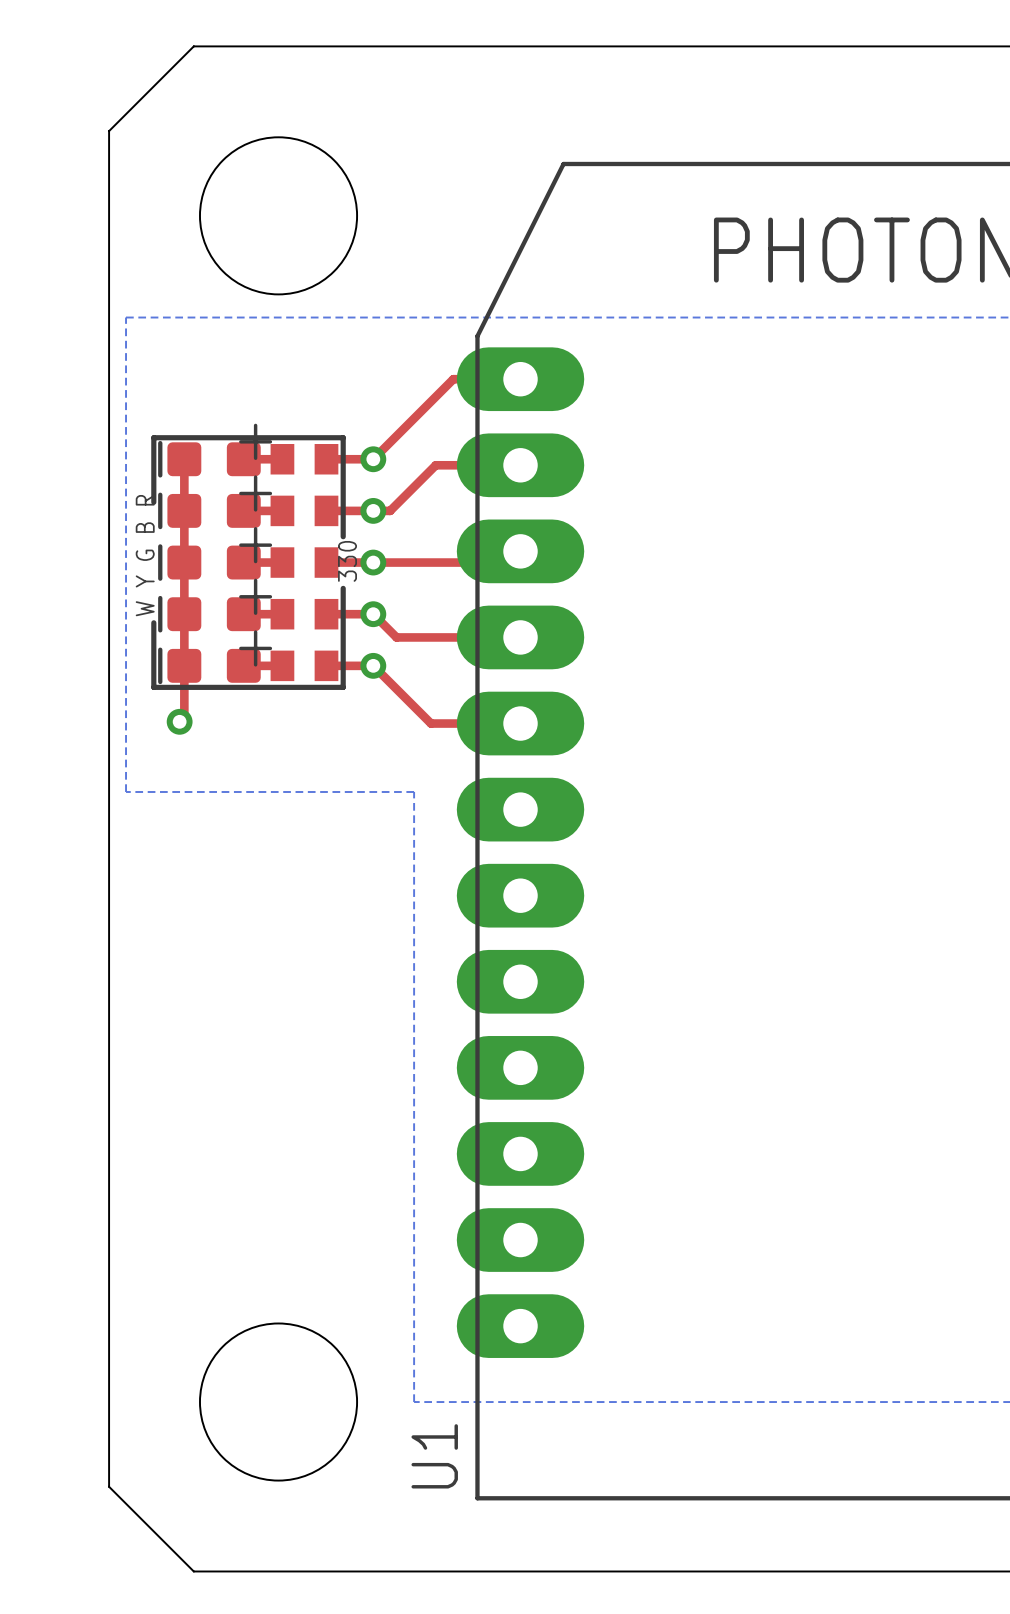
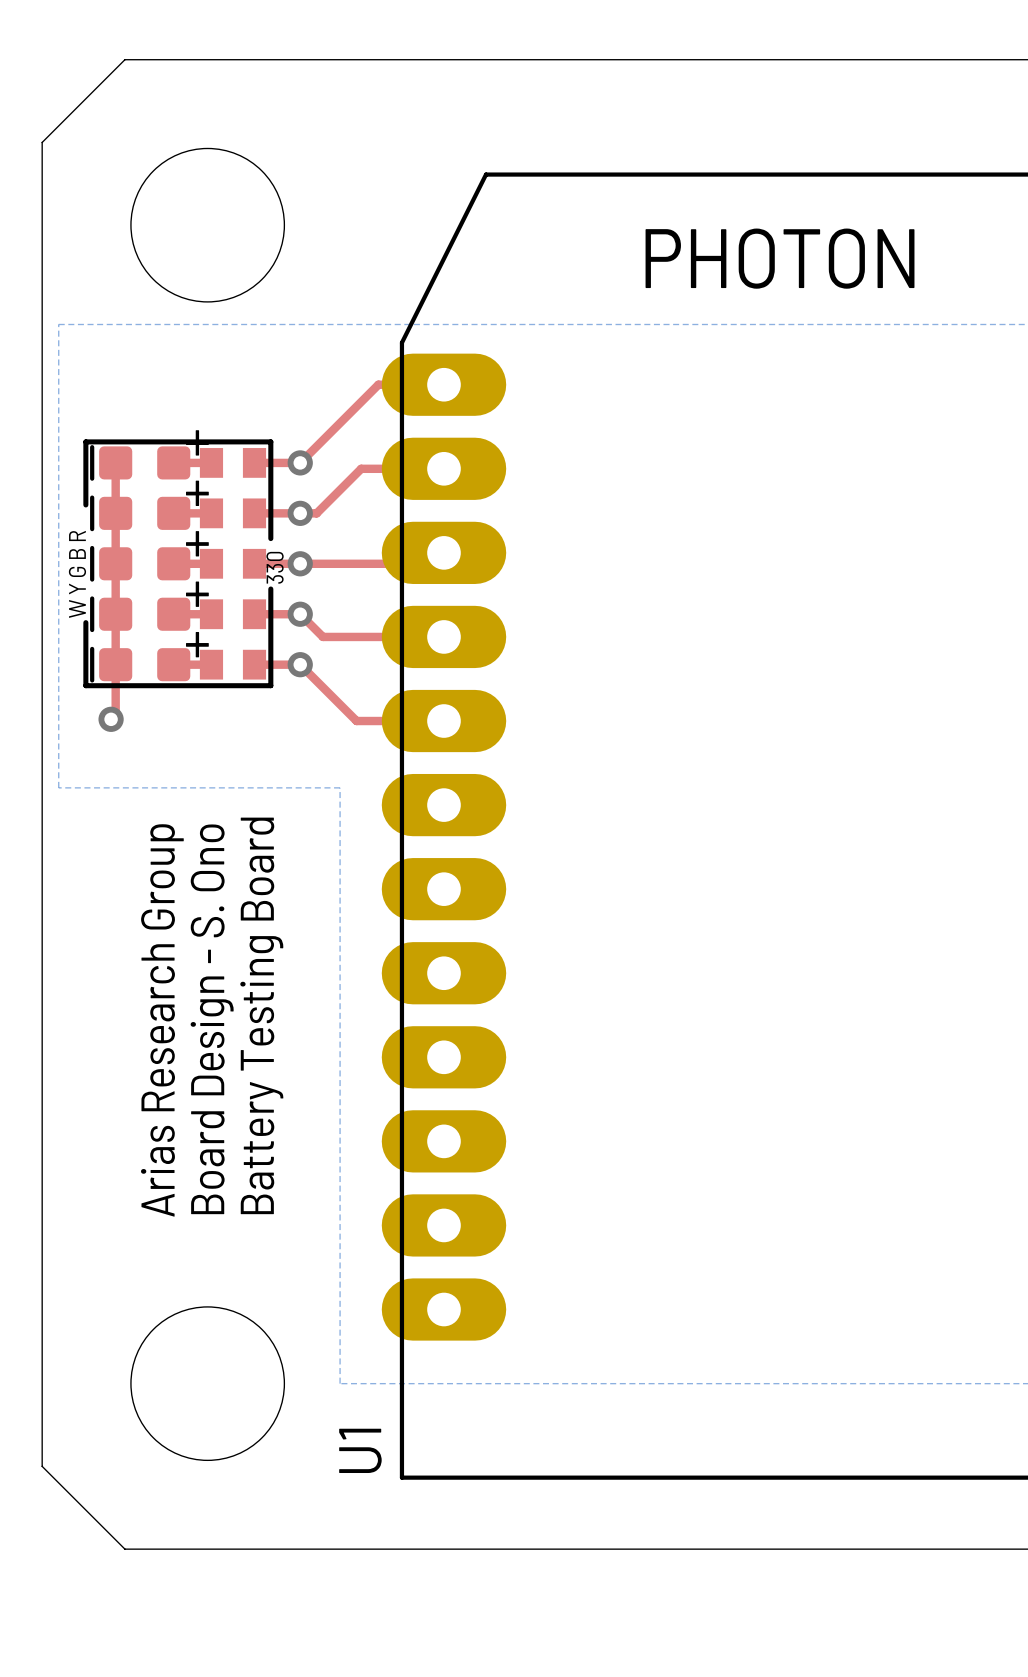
text: none -> Board Design - S. Ono (212, 1019)
text: none -> Battery Testing Board (261, 1015)
text: none -> Arias Research Group (162, 1020)

